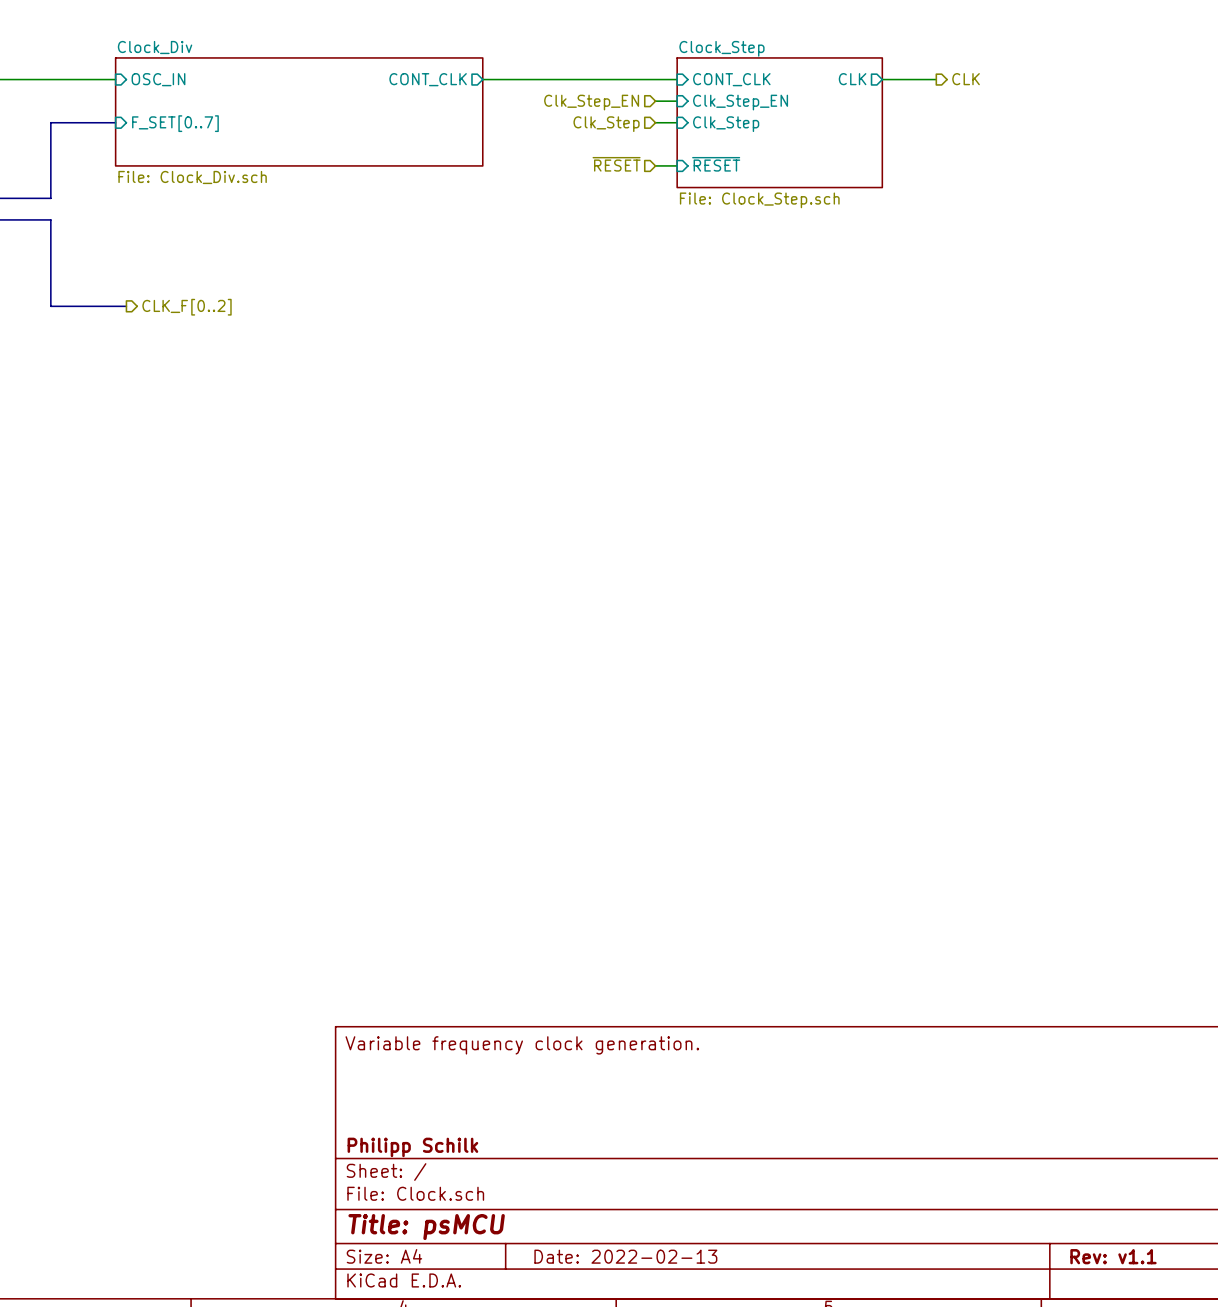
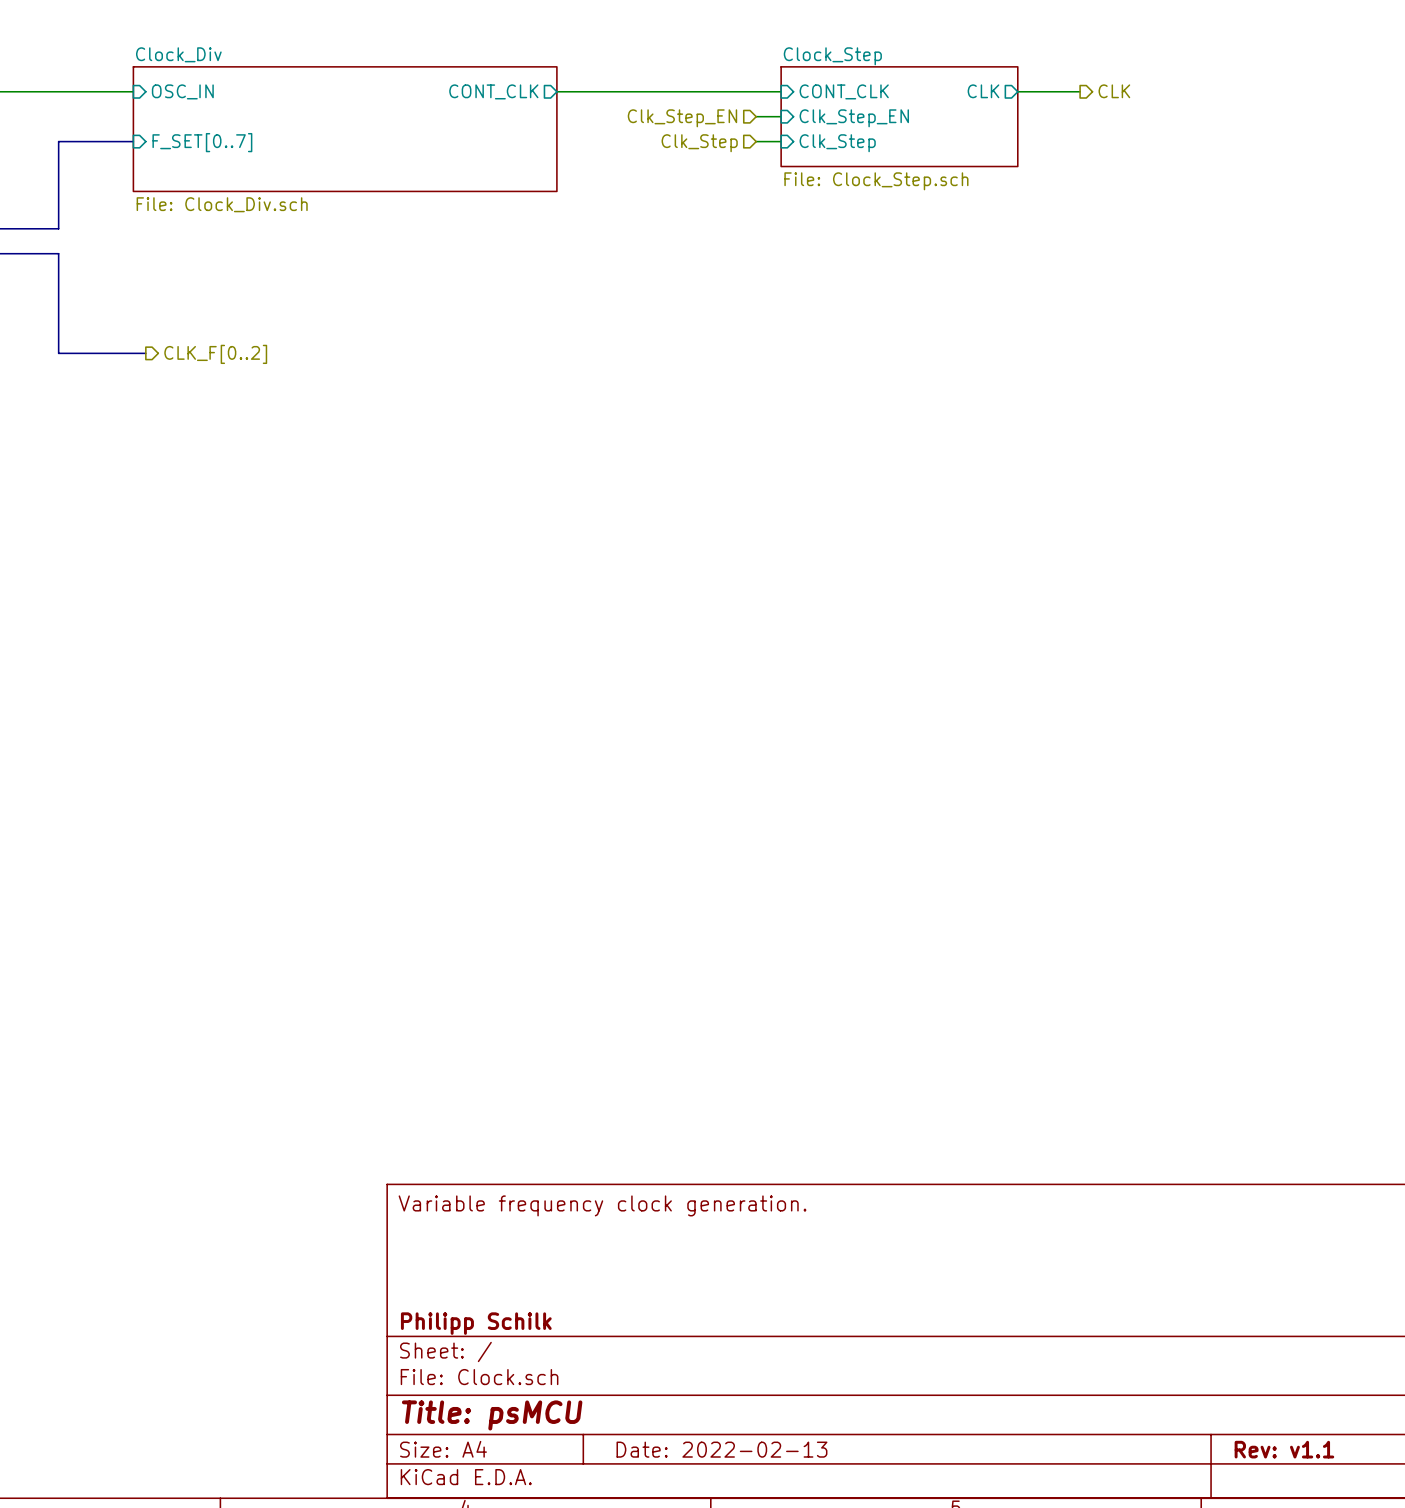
sheet Clock_Step: none -> File: Clock_Step.sch (899, 116)
sheet Clock_Step: File: Clock_Step.sch (779, 122) -> none
hierarchical label: ~{RESET} (616, 164) -> none
sheet pin: ~{RESET} (716, 164) -> none
wire: (655, 165) (677, 165) -> none

